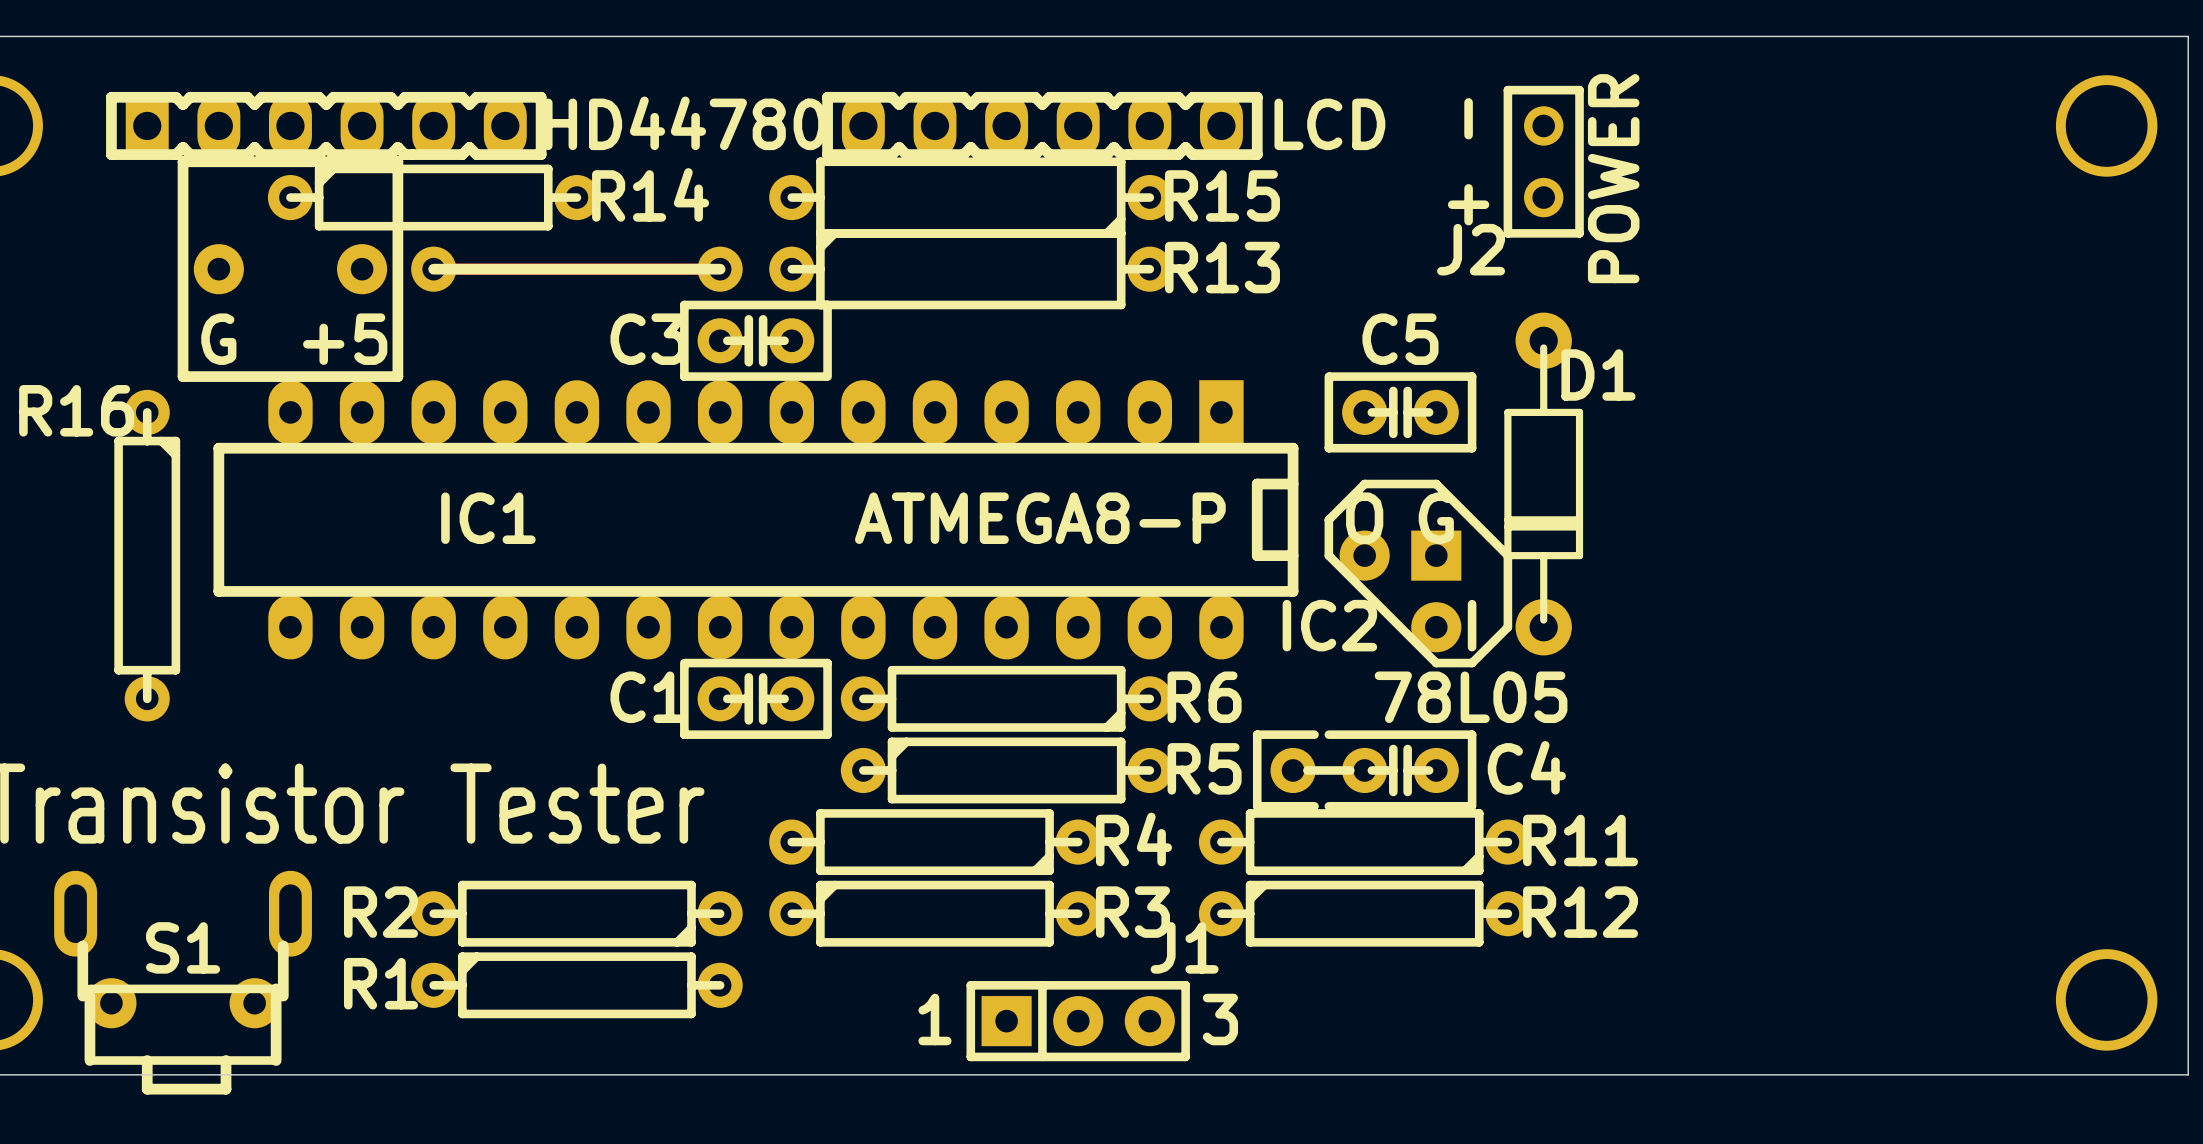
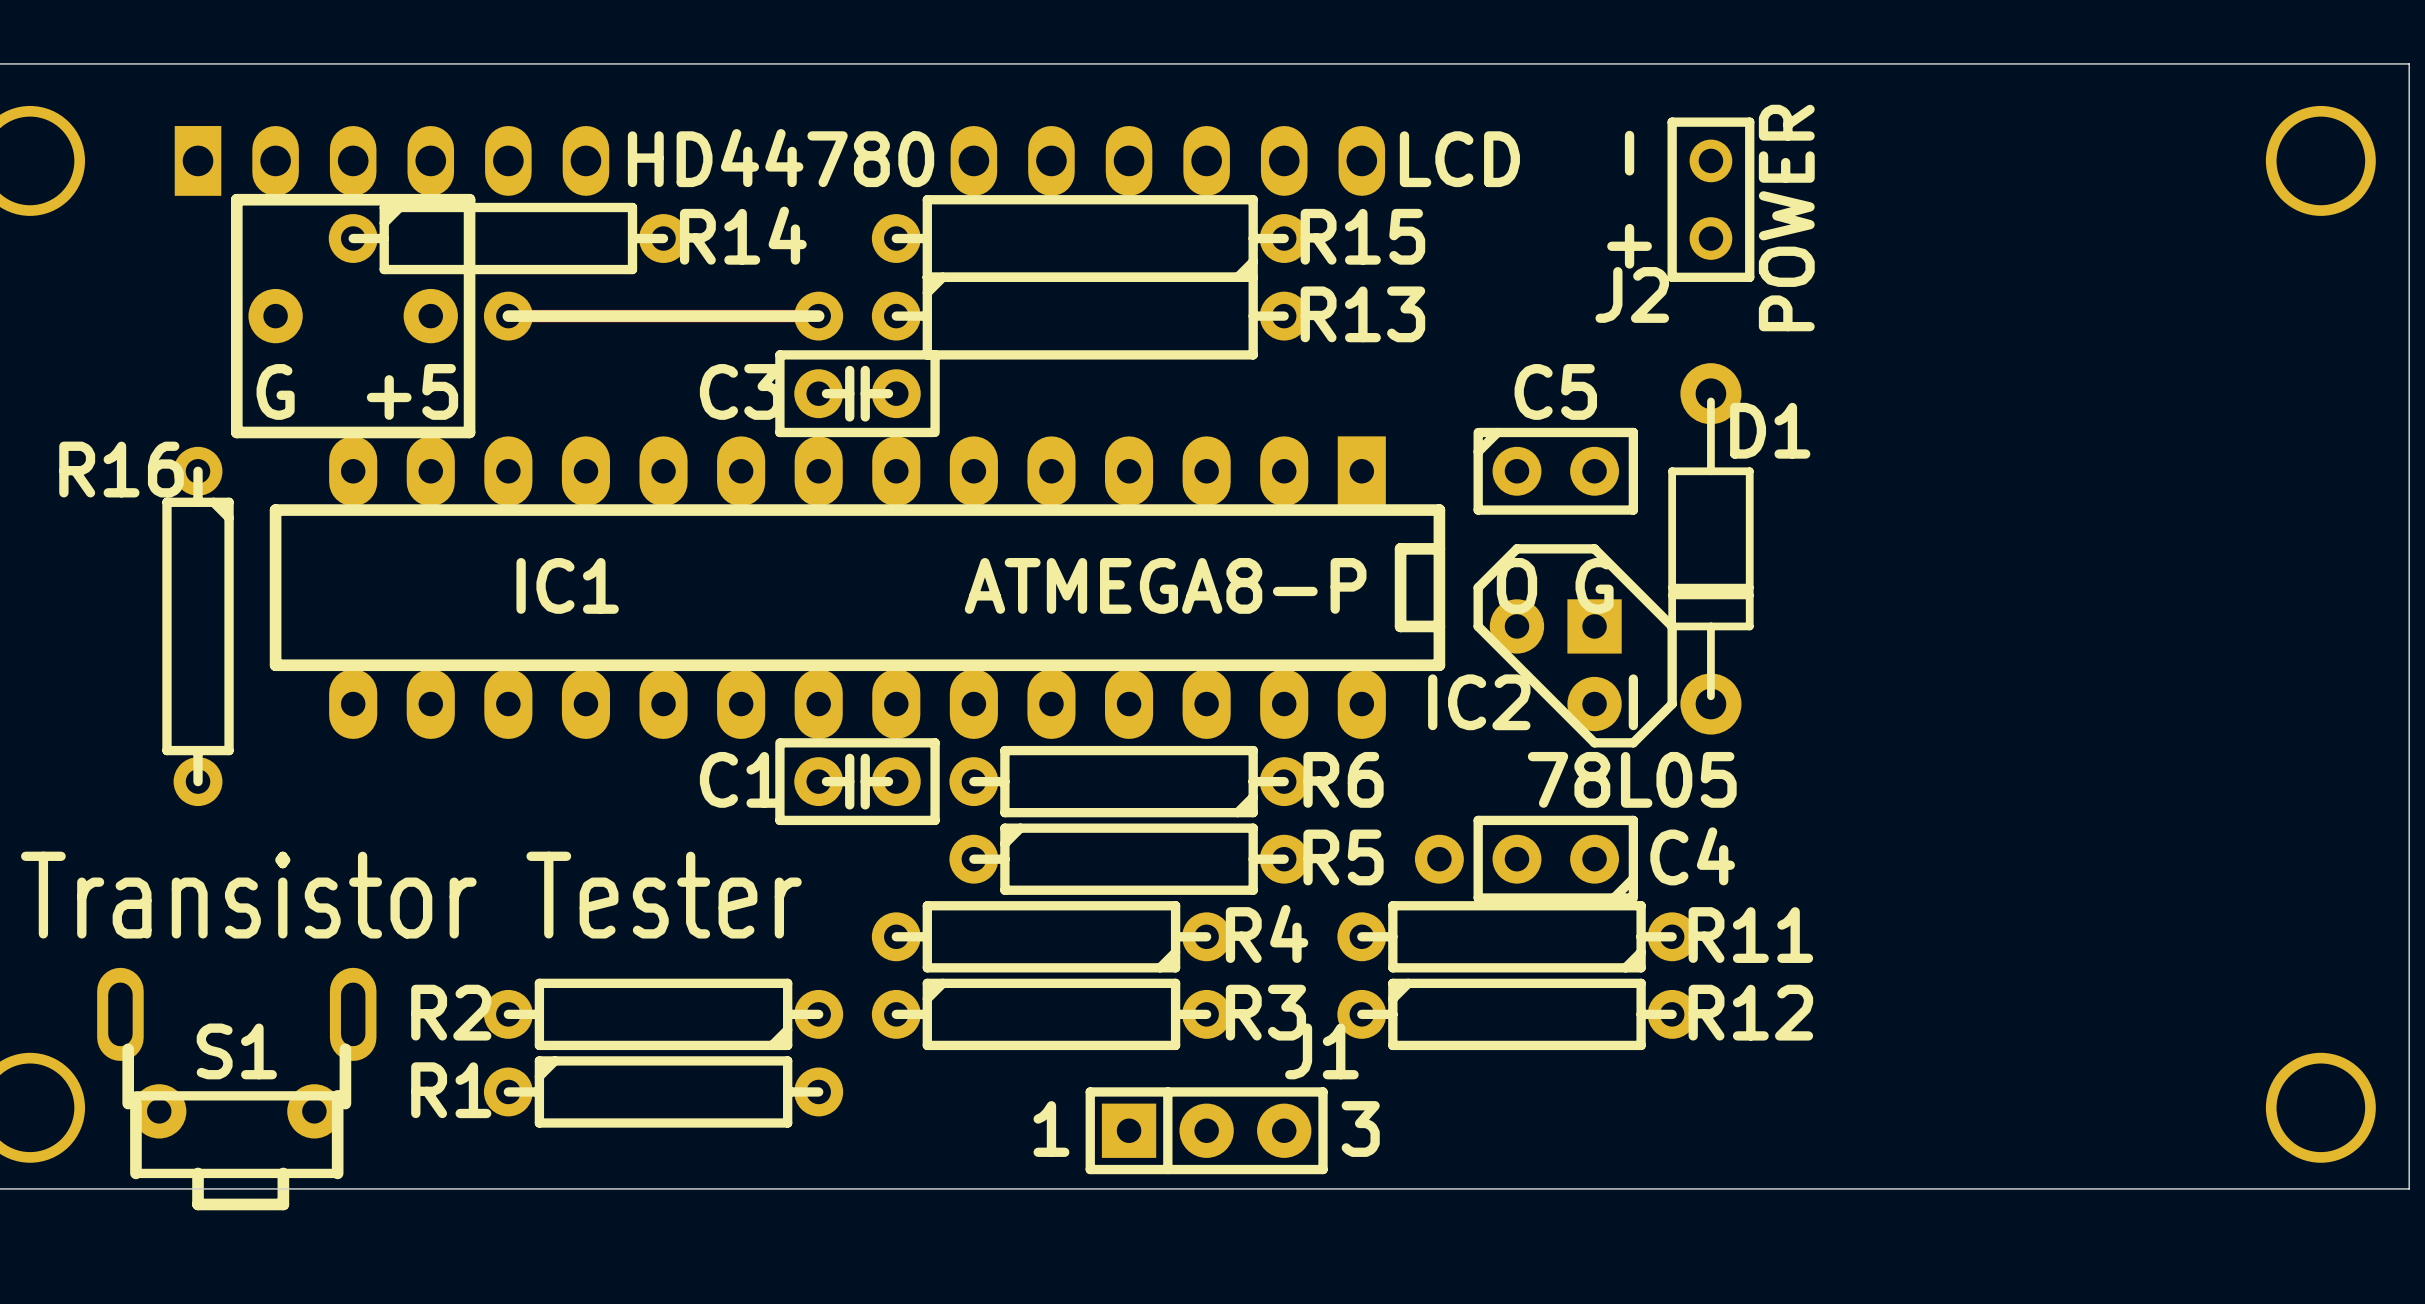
LCD footprint: [106, 91, 1263, 160] -> [174, 126, 1386, 196]
C5 footprint: [1324, 372, 1477, 453] -> [1473, 427, 1639, 515]
C4 footprint: [1252, 730, 1477, 811] -> [1473, 815, 1639, 903]
part: none -> (1439, 859)

